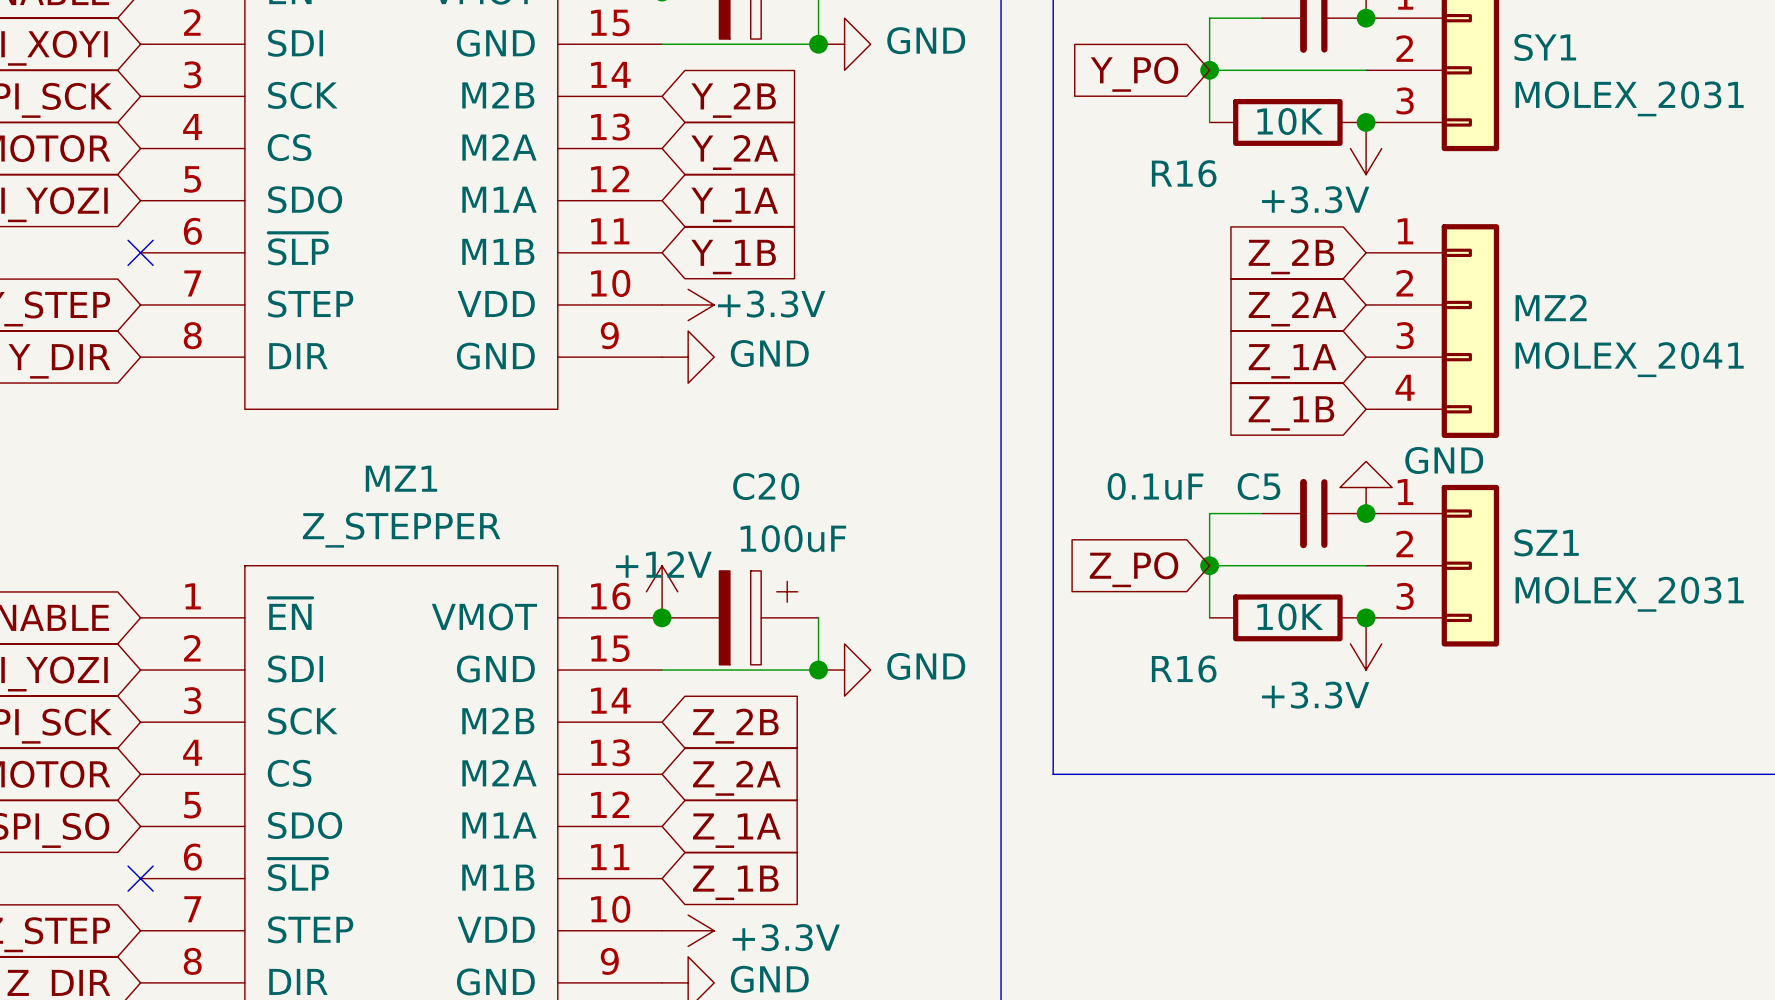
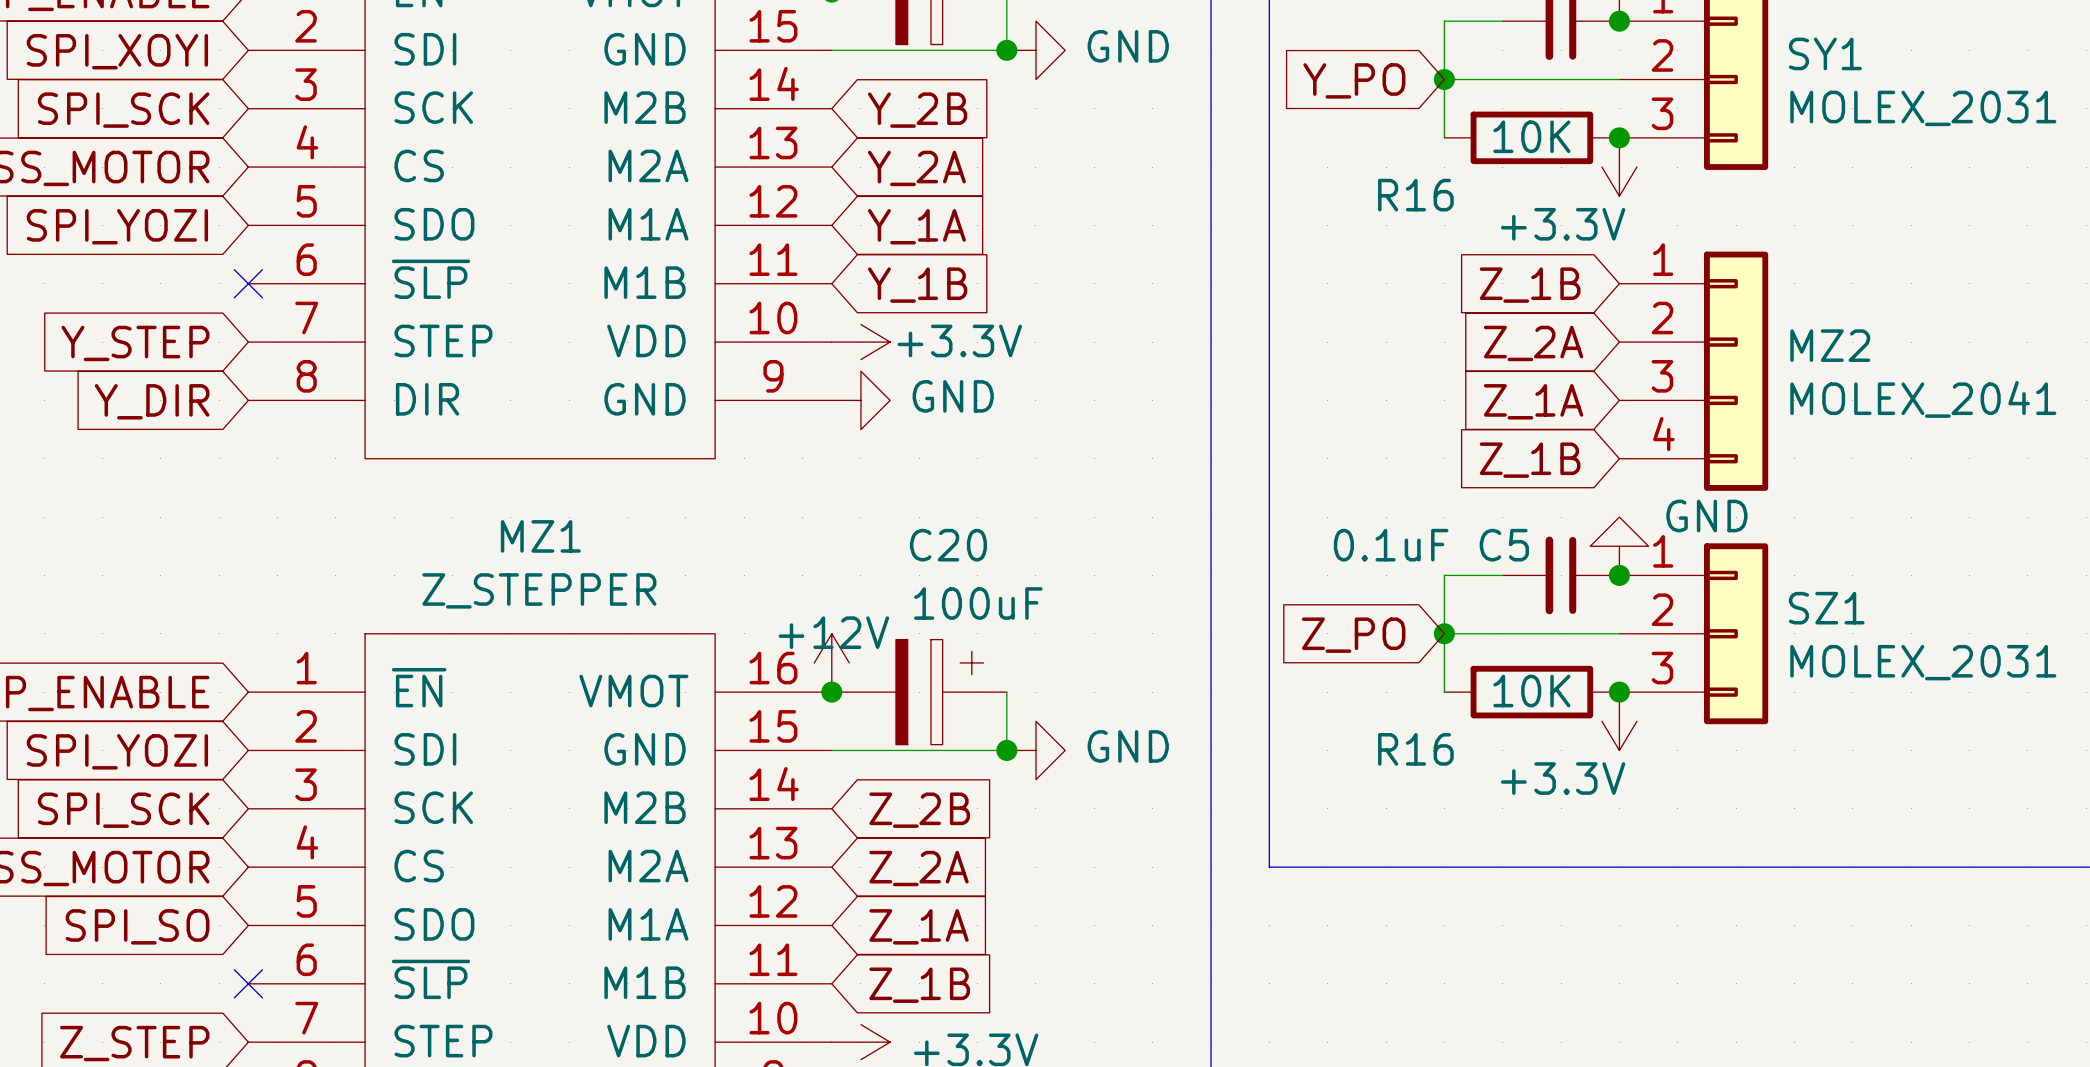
global label: Z_2B (1291, 256) -> Z_1B (1530, 285)

